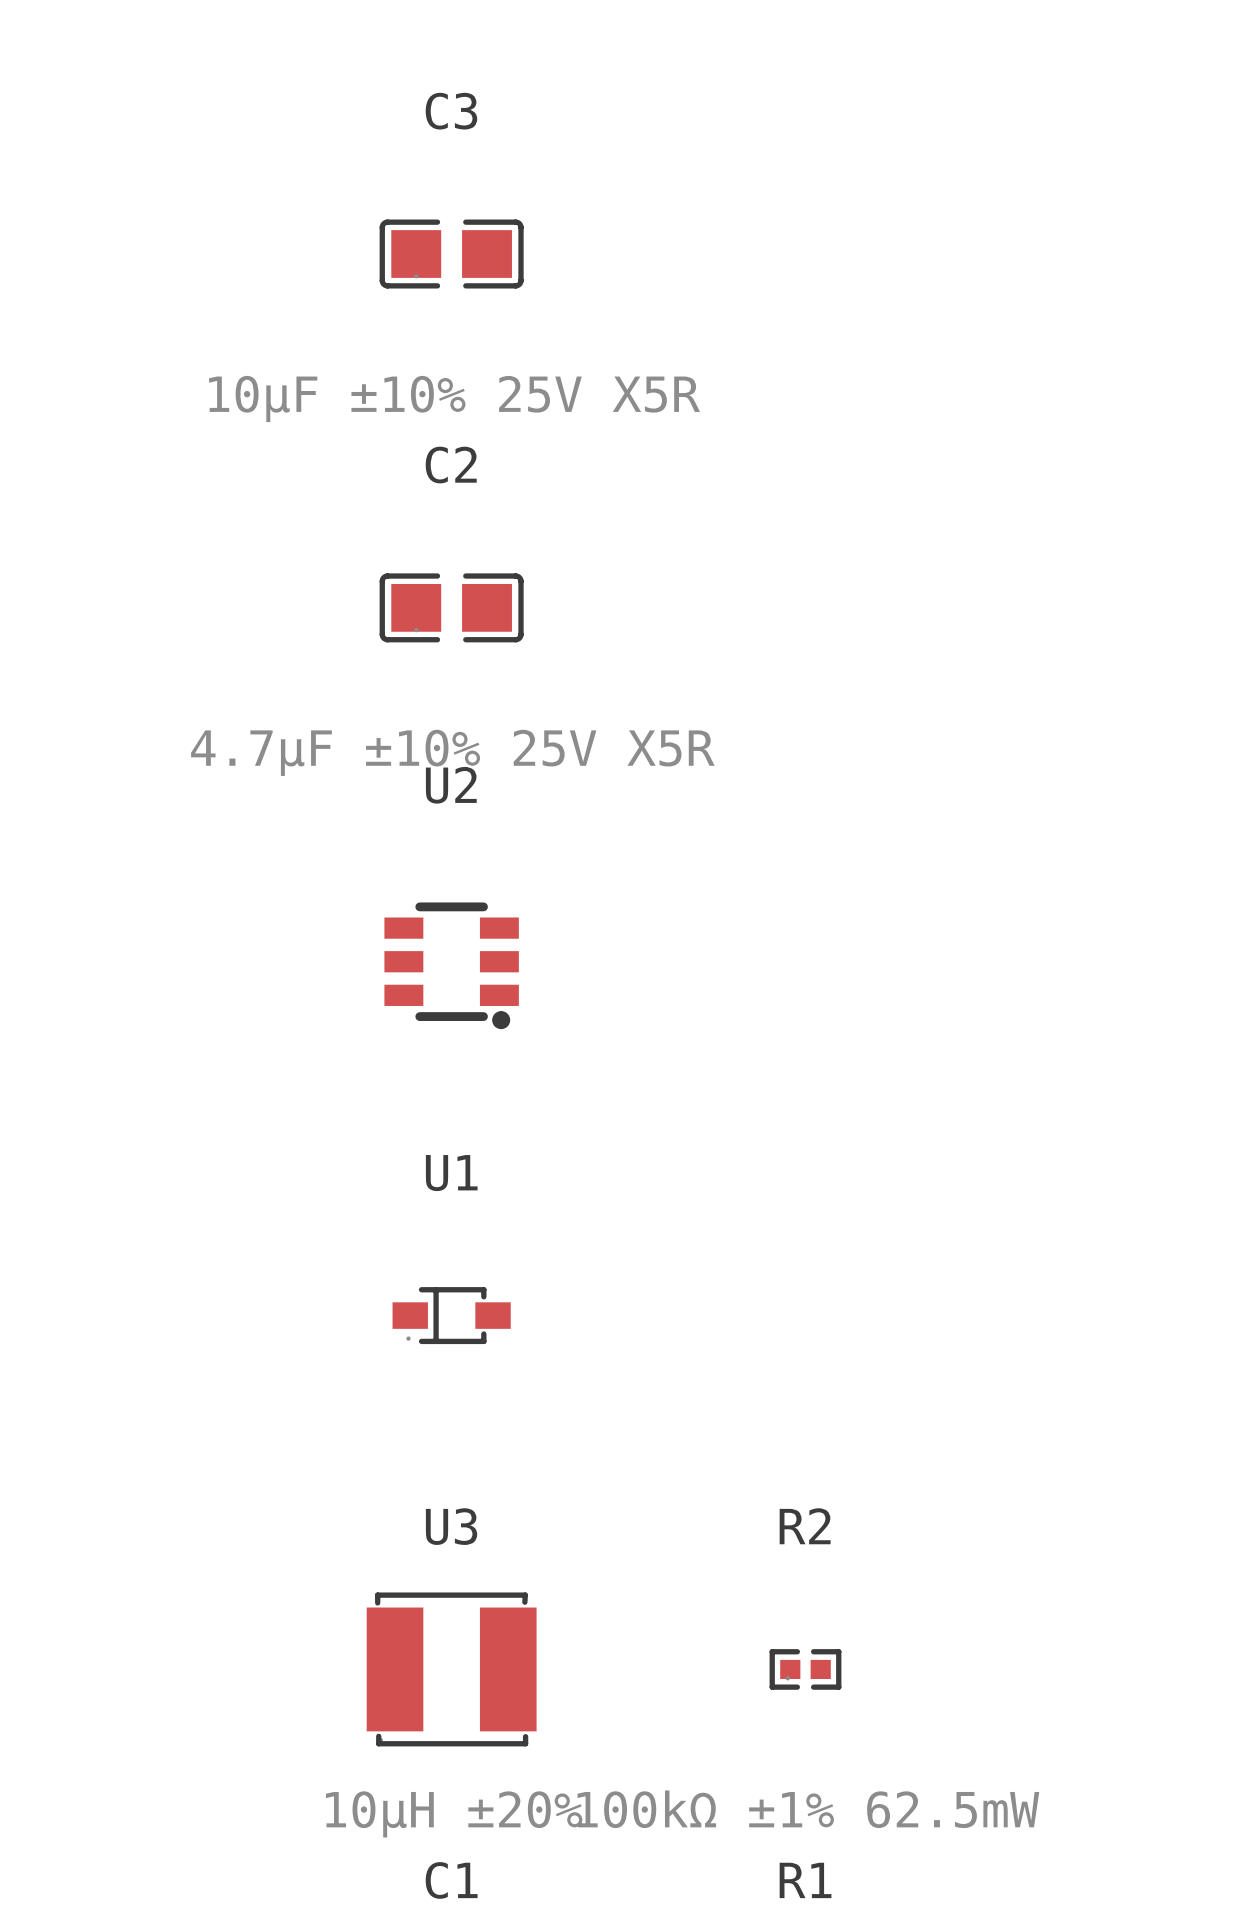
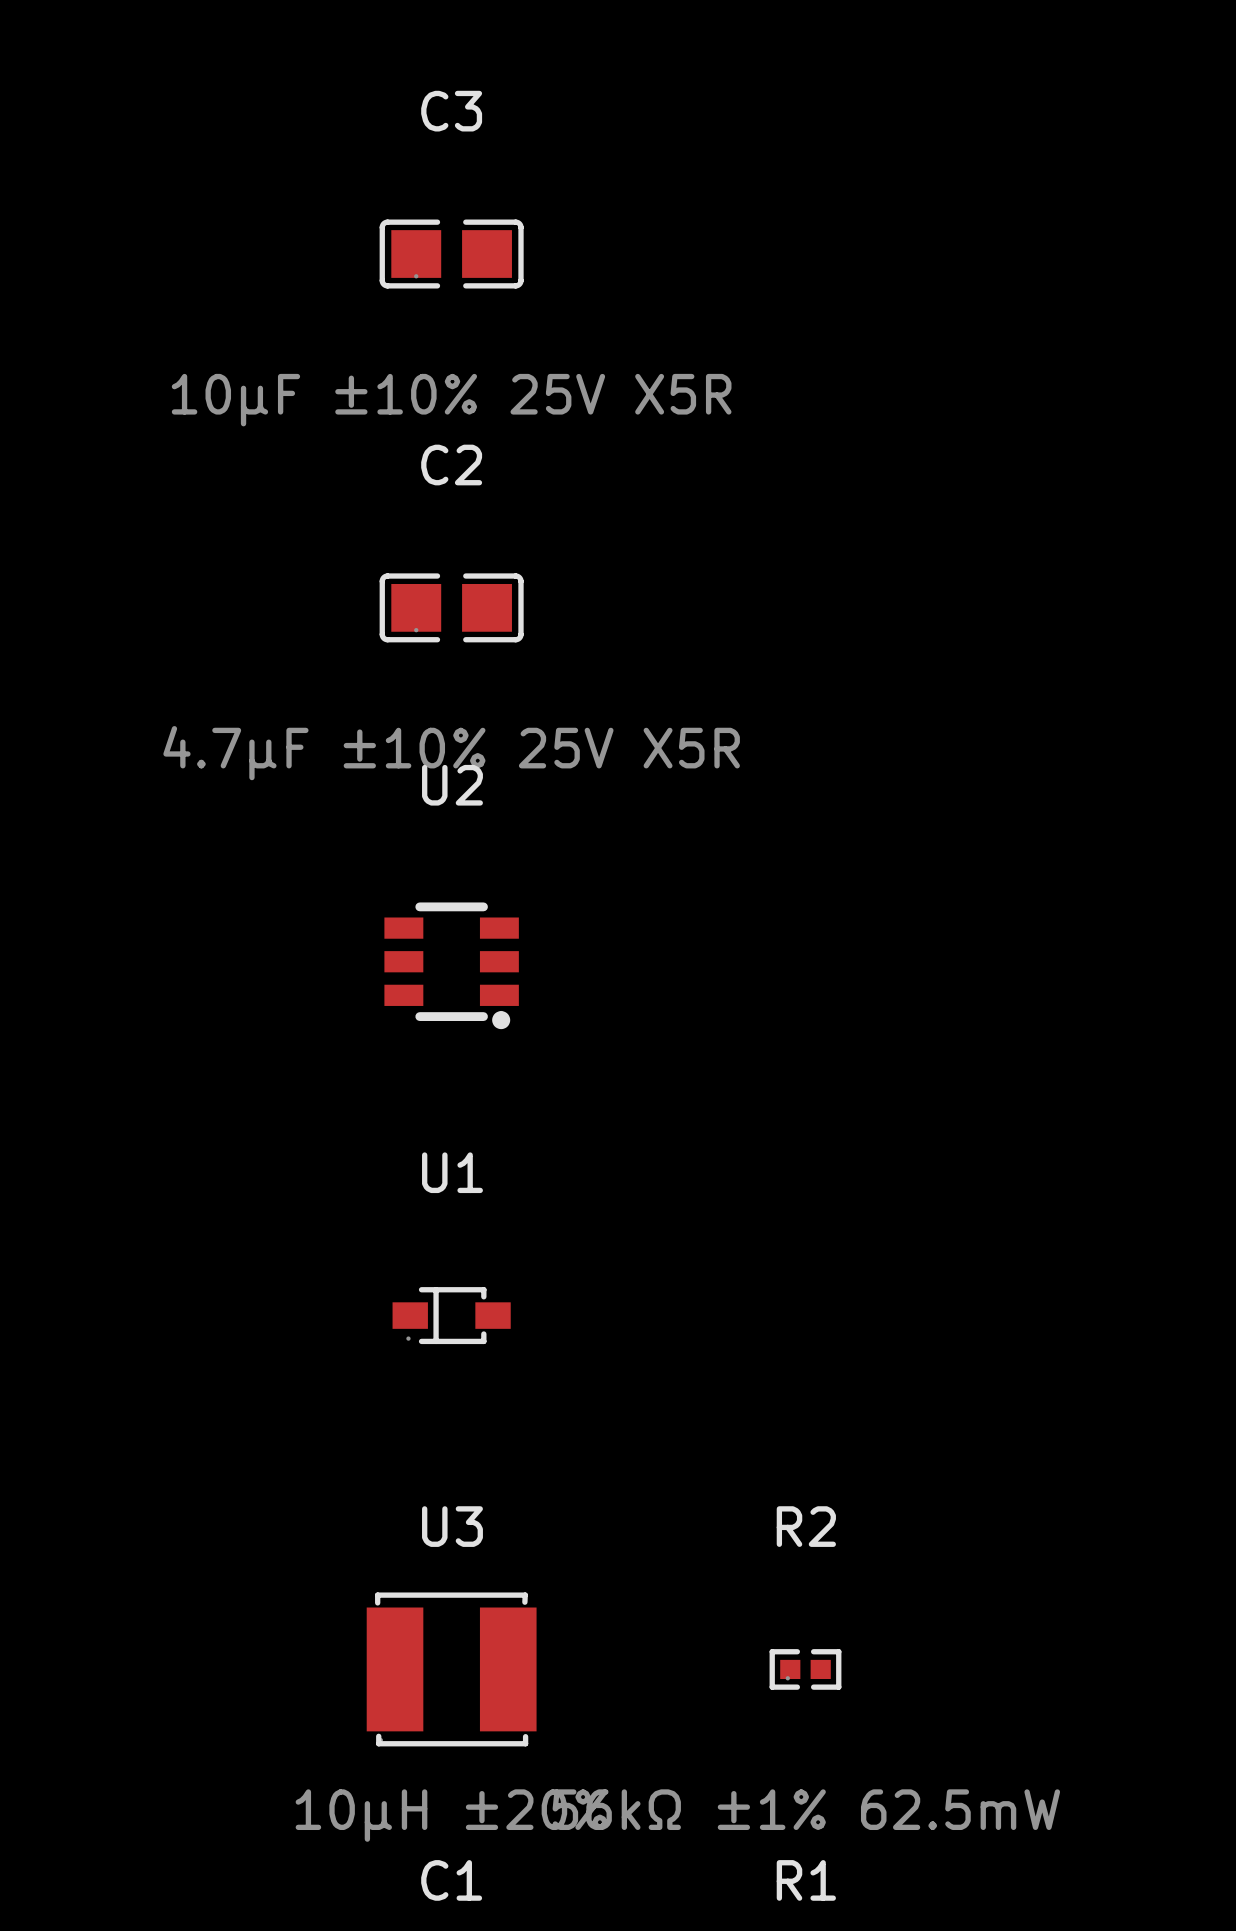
R2 value: 100kΩ ±1% 62.5mW (808, 1809) -> 56kΩ ±1% 62.5mW (806, 1809)

